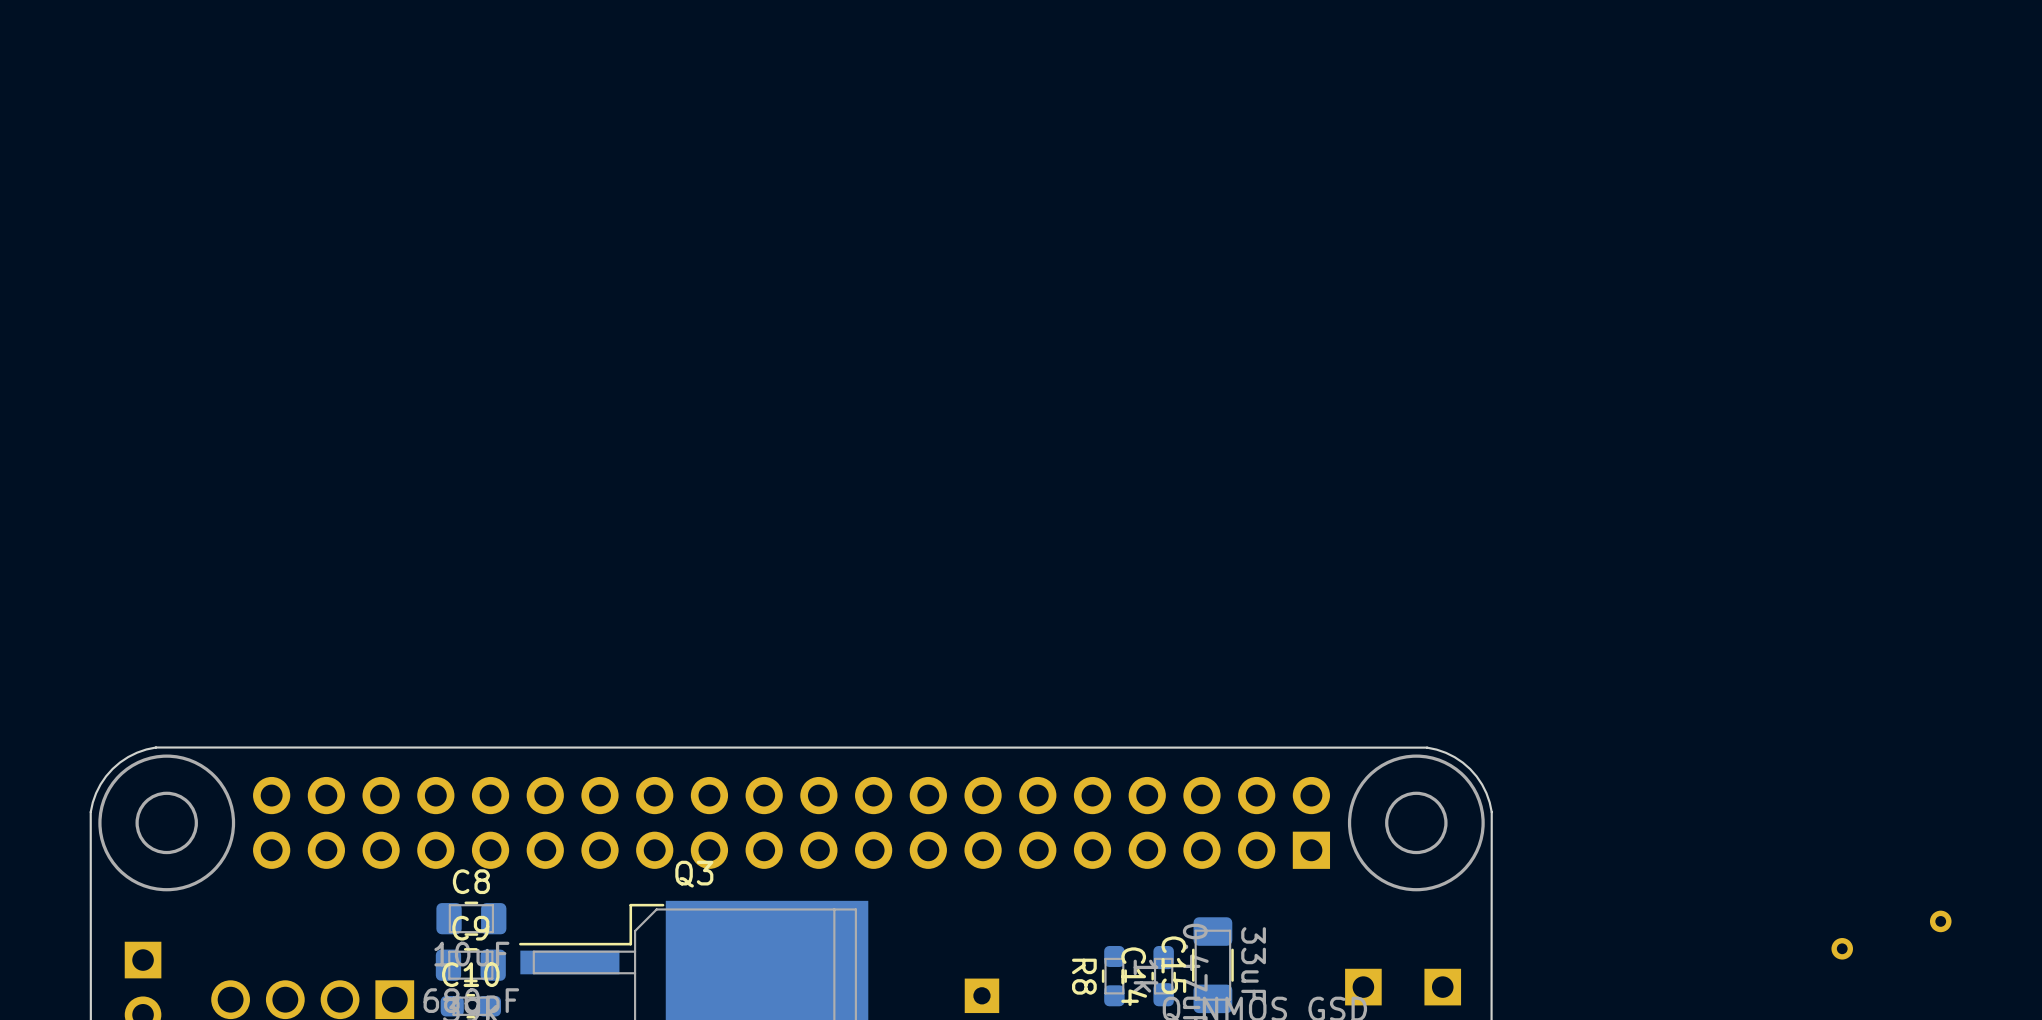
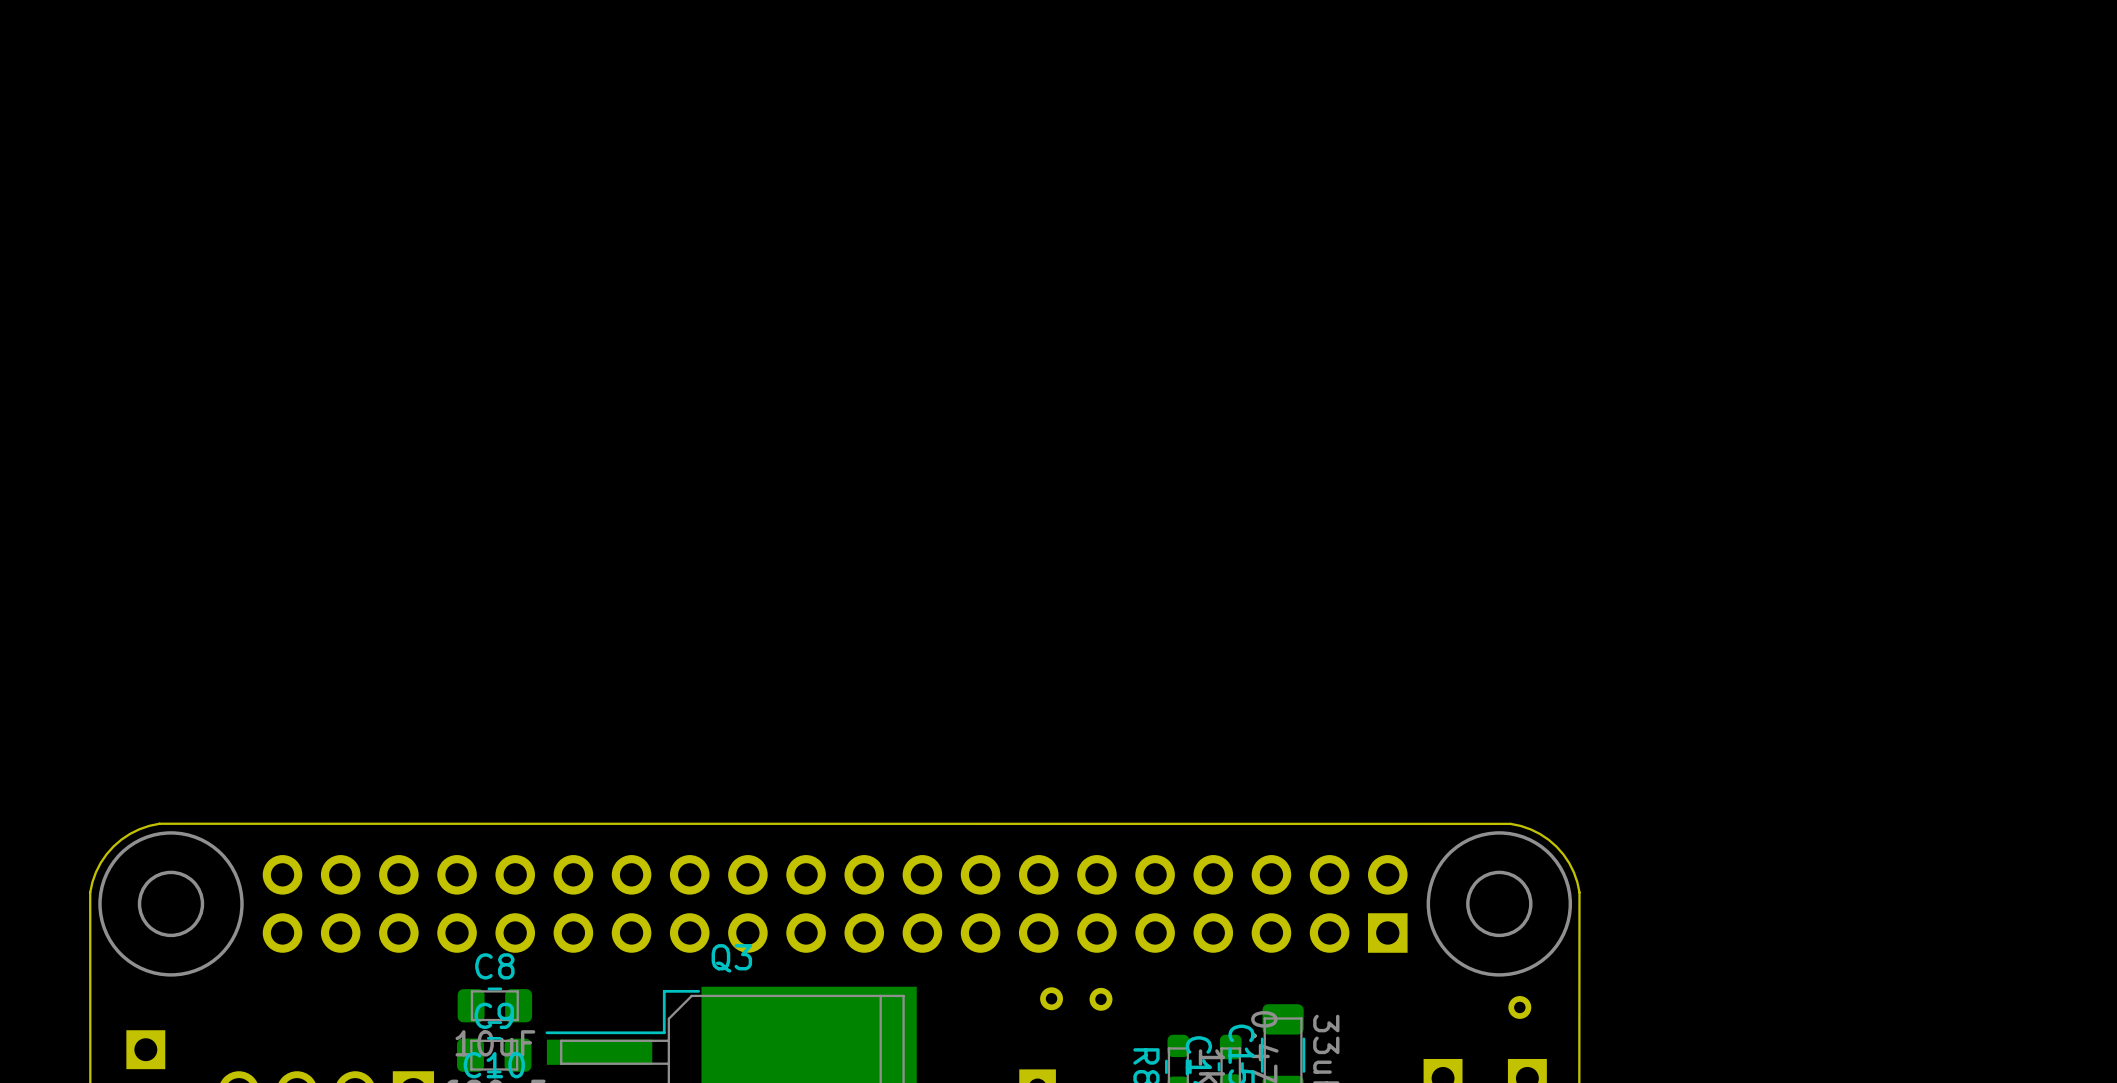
part: none -> (1051, 998)
part: none -> (1101, 999)
part: none -> (1519, 1007)
part: (1940, 921) -> none
part: (1842, 948) -> none

